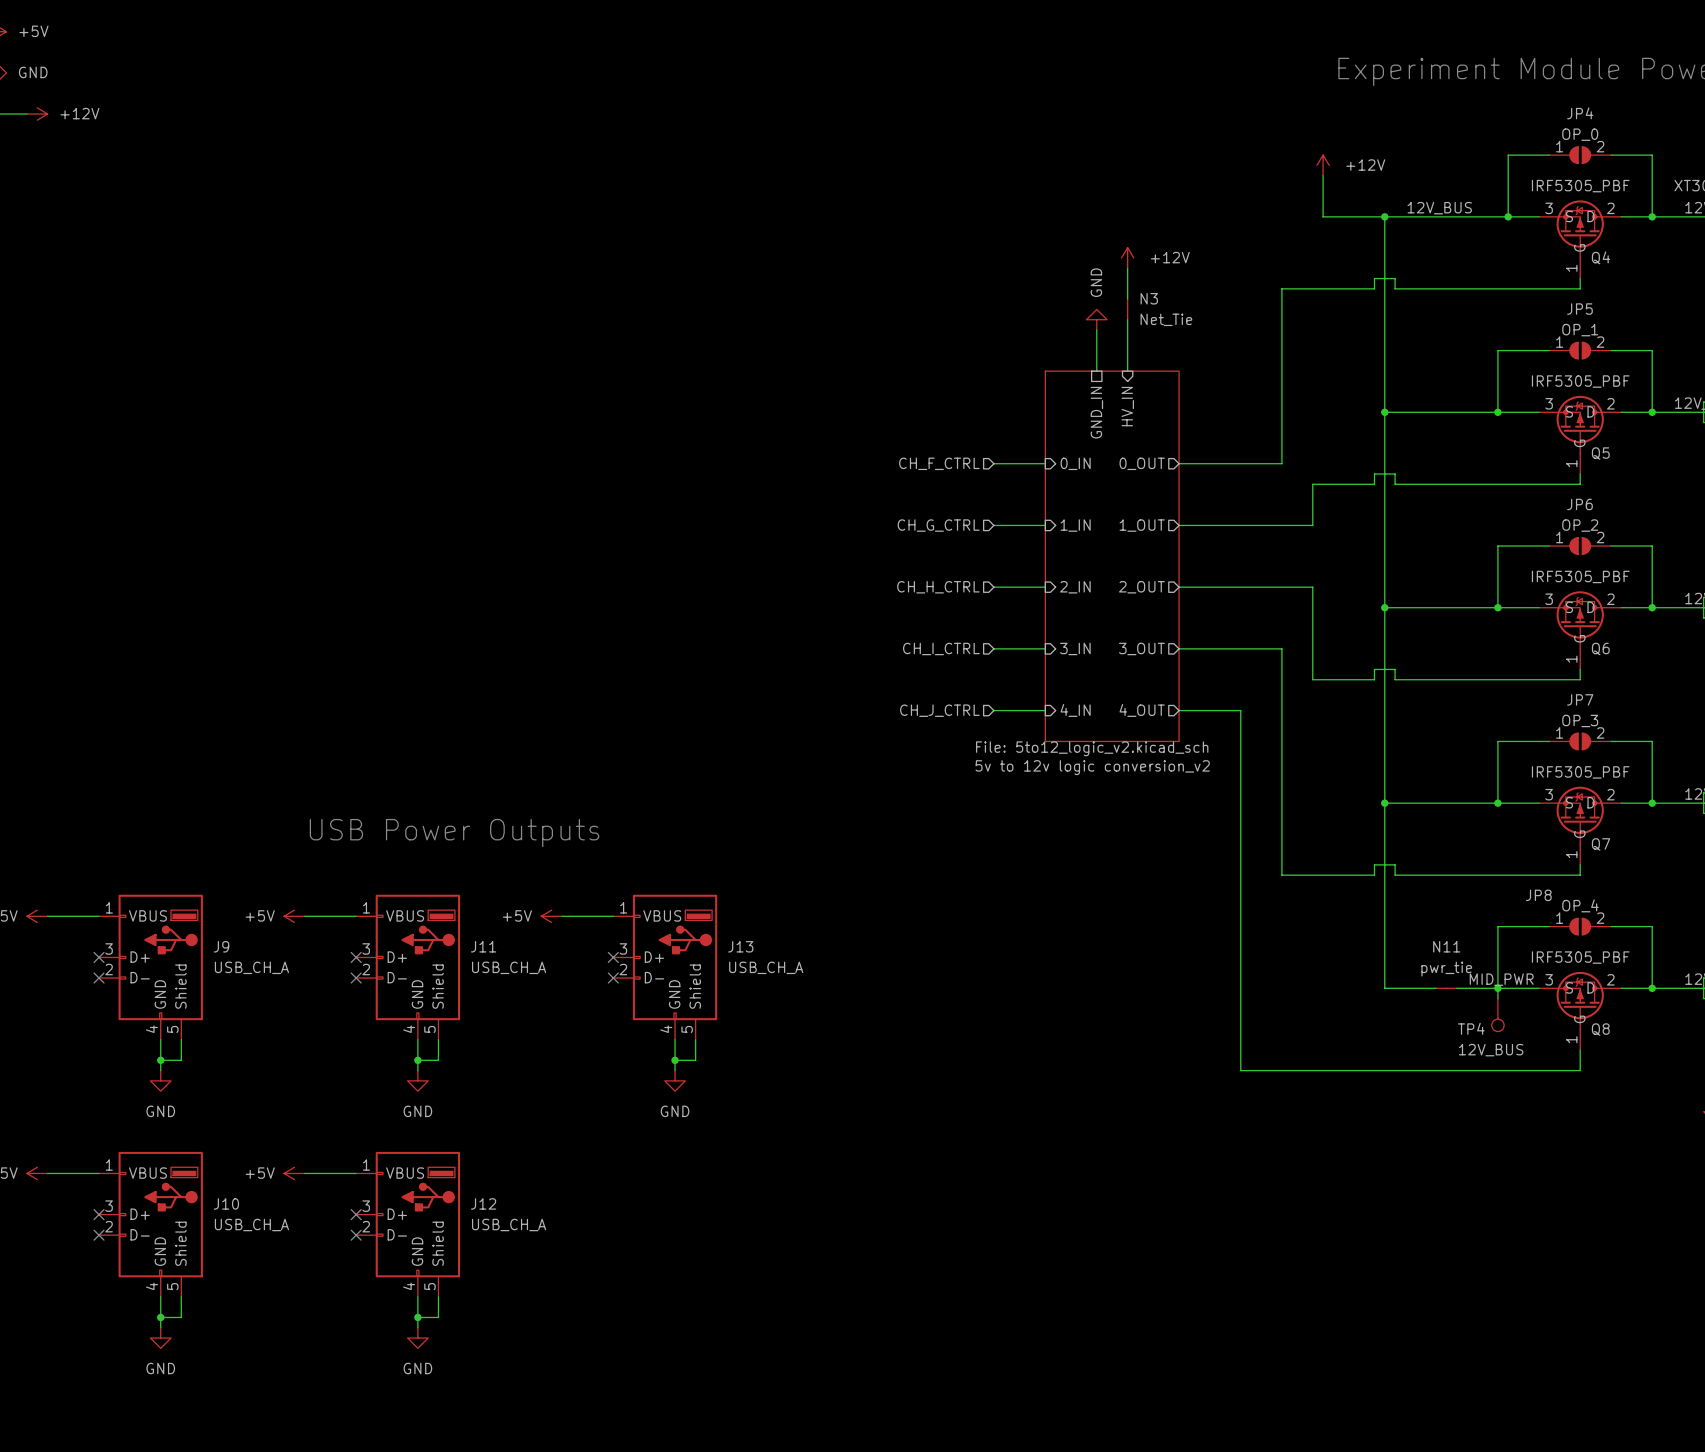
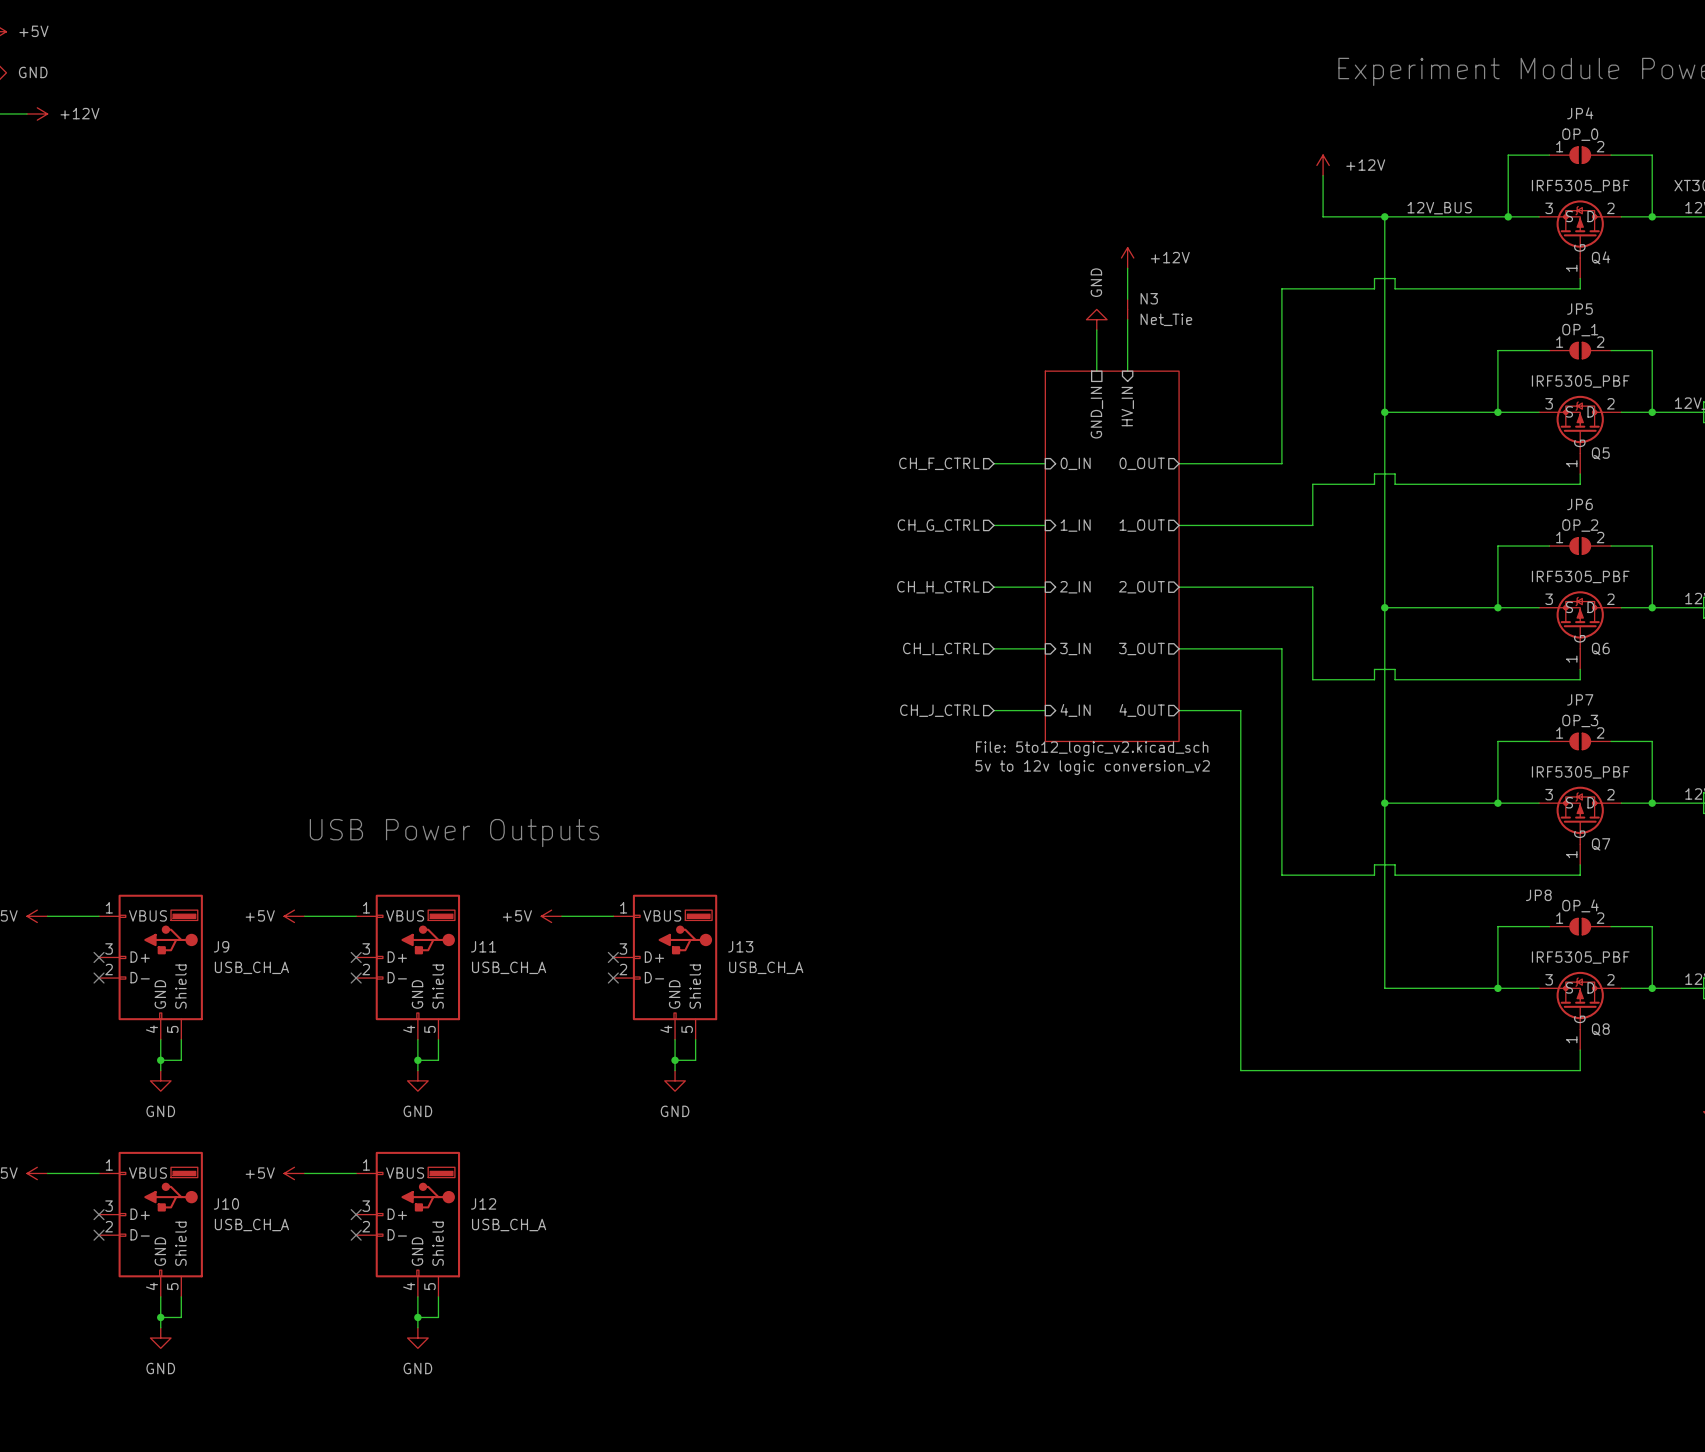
label: MID_PWR (1501, 979) -> none
N11: pwr_tie (1446, 988) -> none
wire: (1497, 988) (1497, 998) -> none
TP4: 12V_BUS (1497, 1015) -> none

